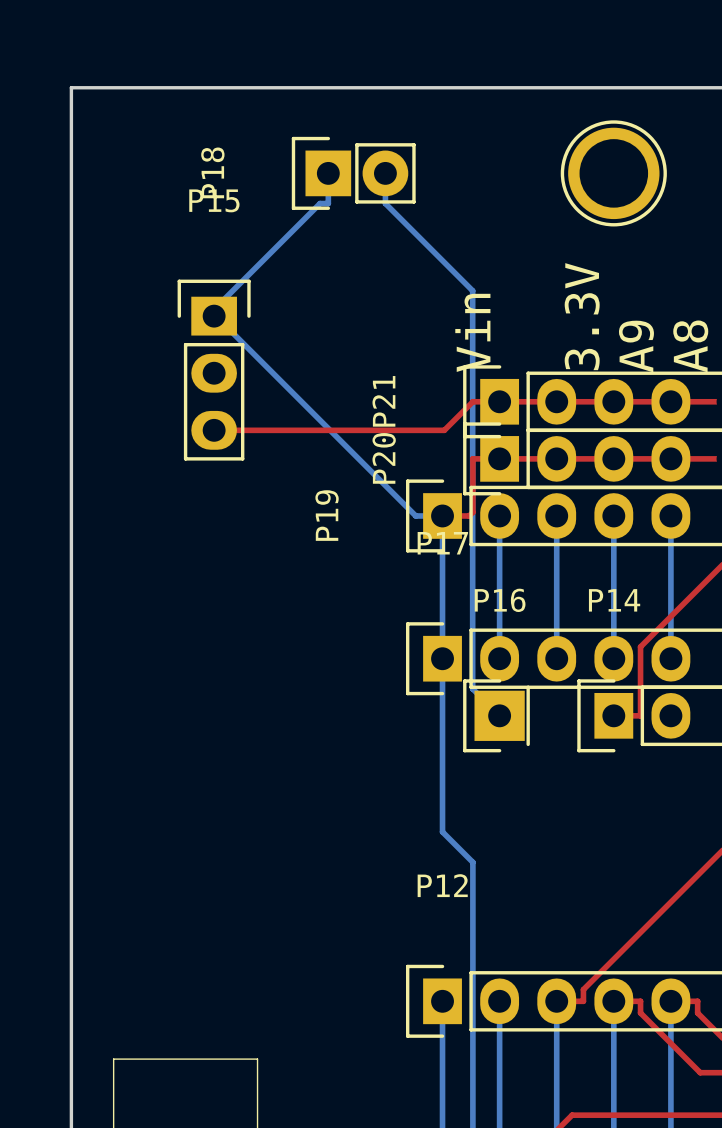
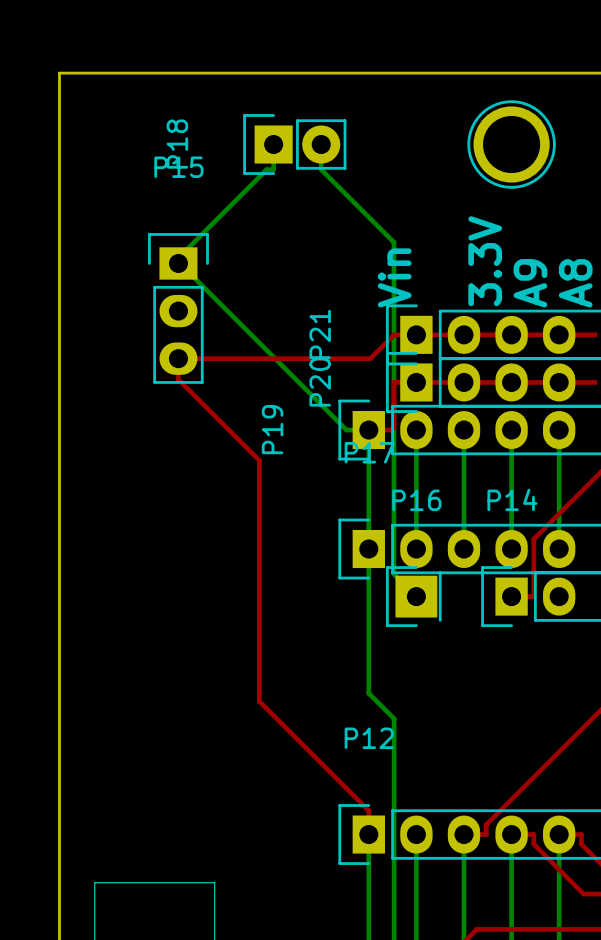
top track: none -> (178, 358) (178, 379) (259, 460) (259, 701) (368, 810) (368, 834)

